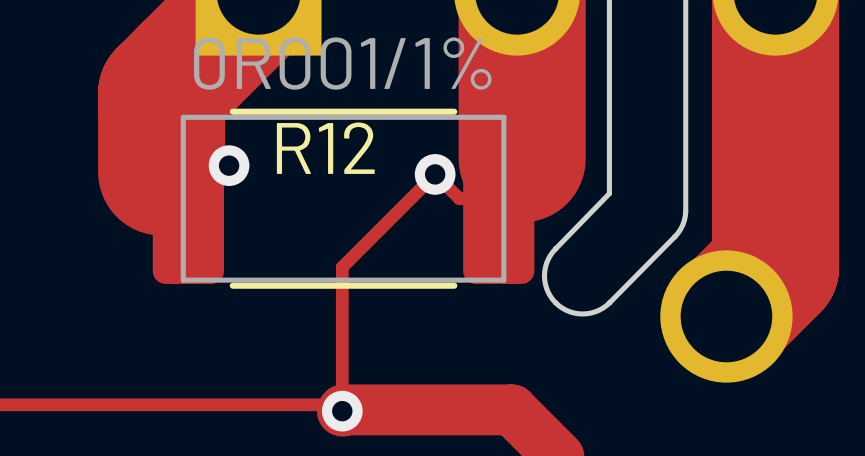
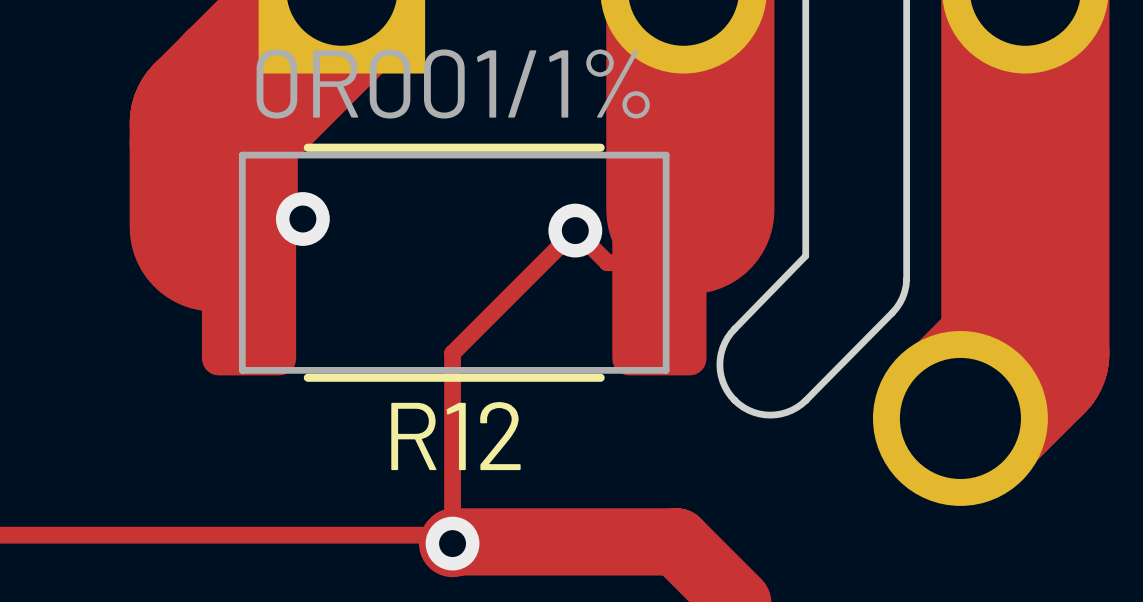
R12 name position: R12 (325, 148) -> R12 (455, 436)

